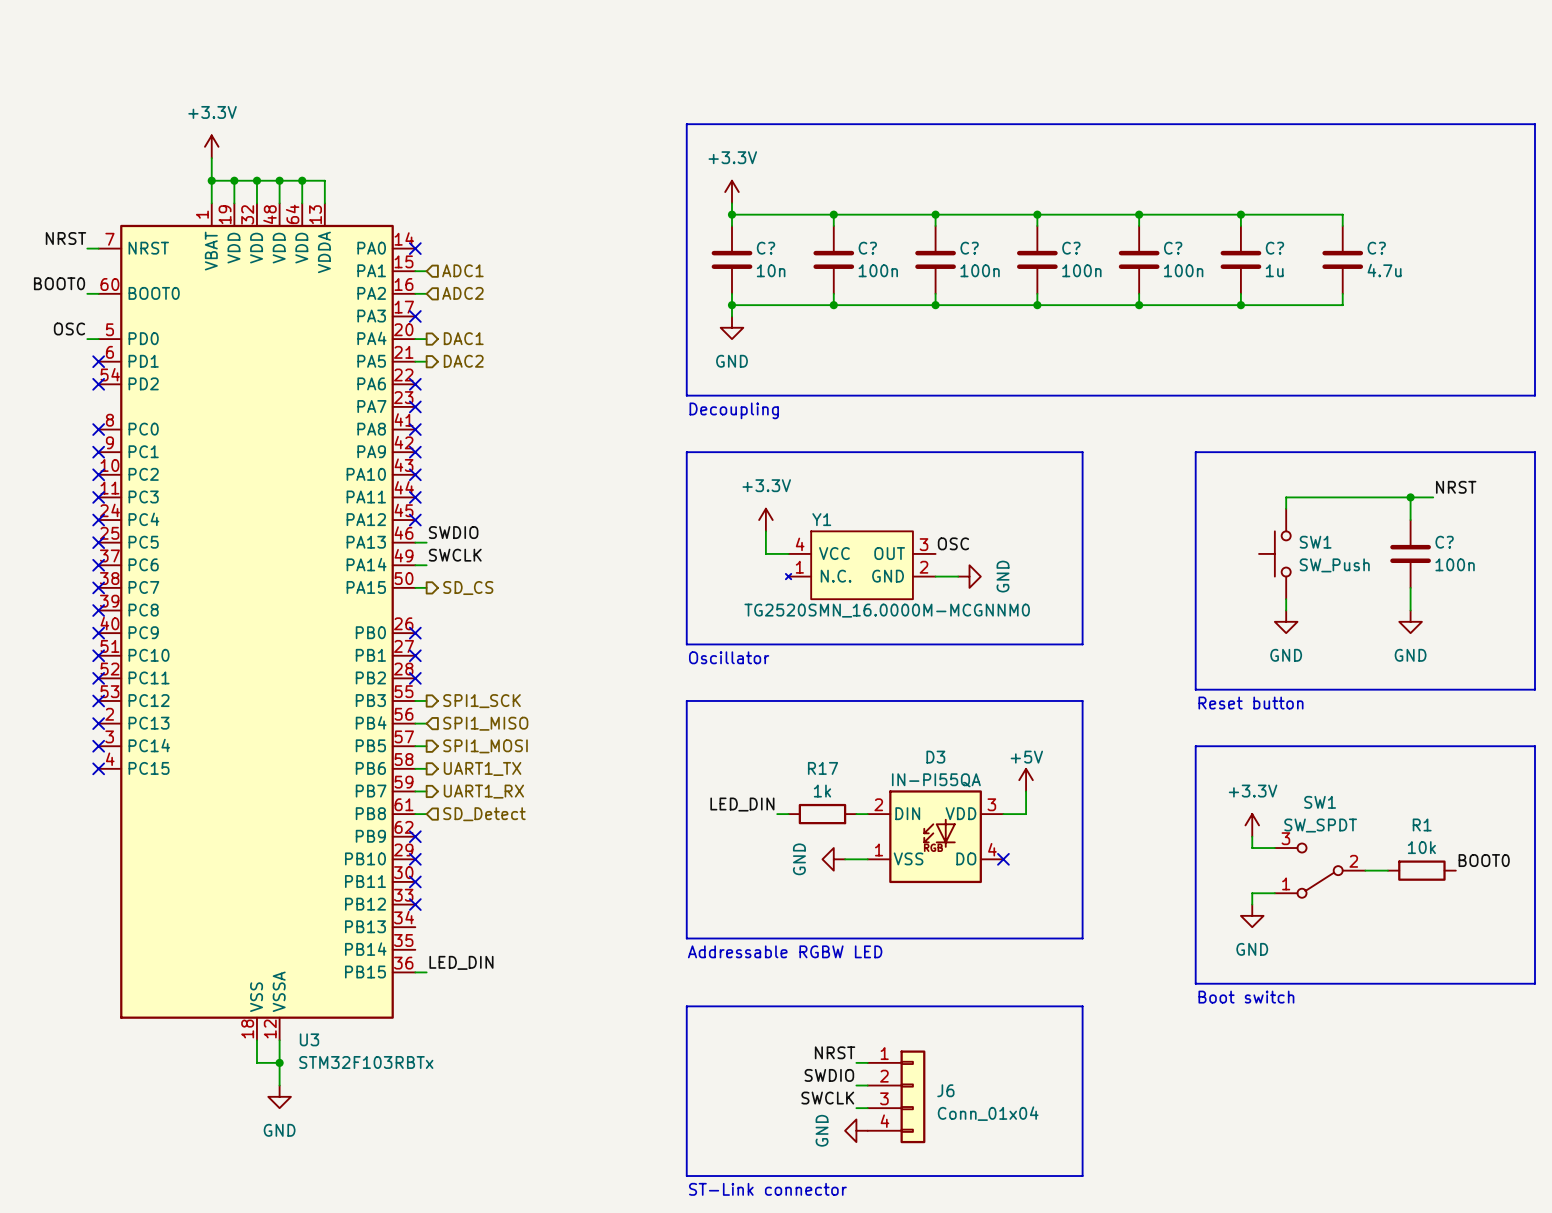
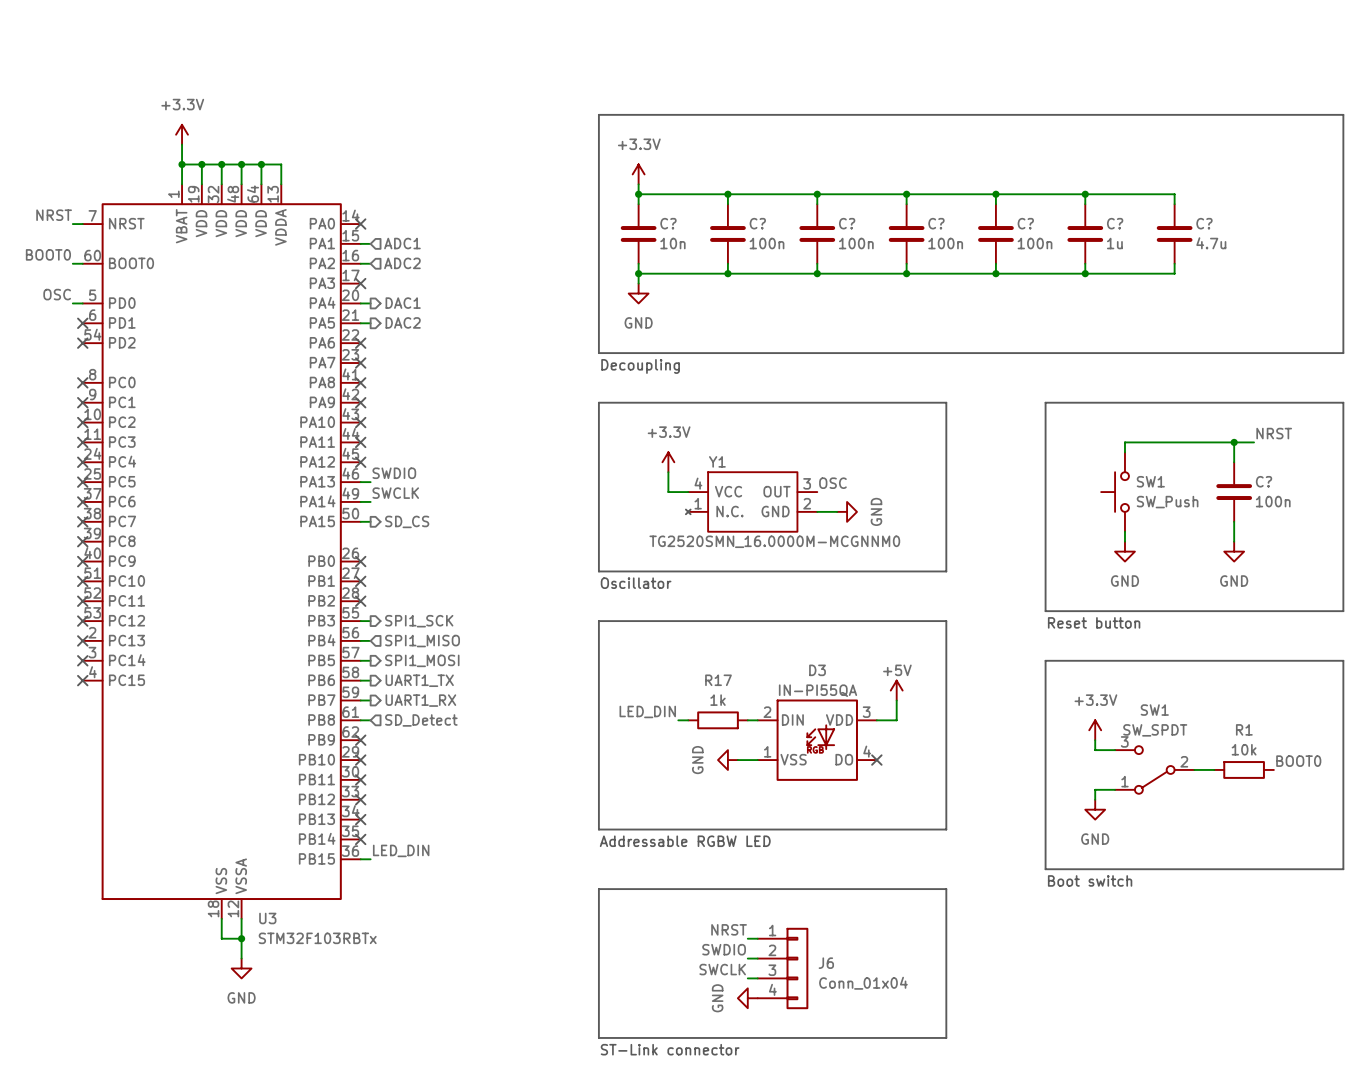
no-connect mark: none -> (360, 819)
no-connect mark: none -> (360, 839)

